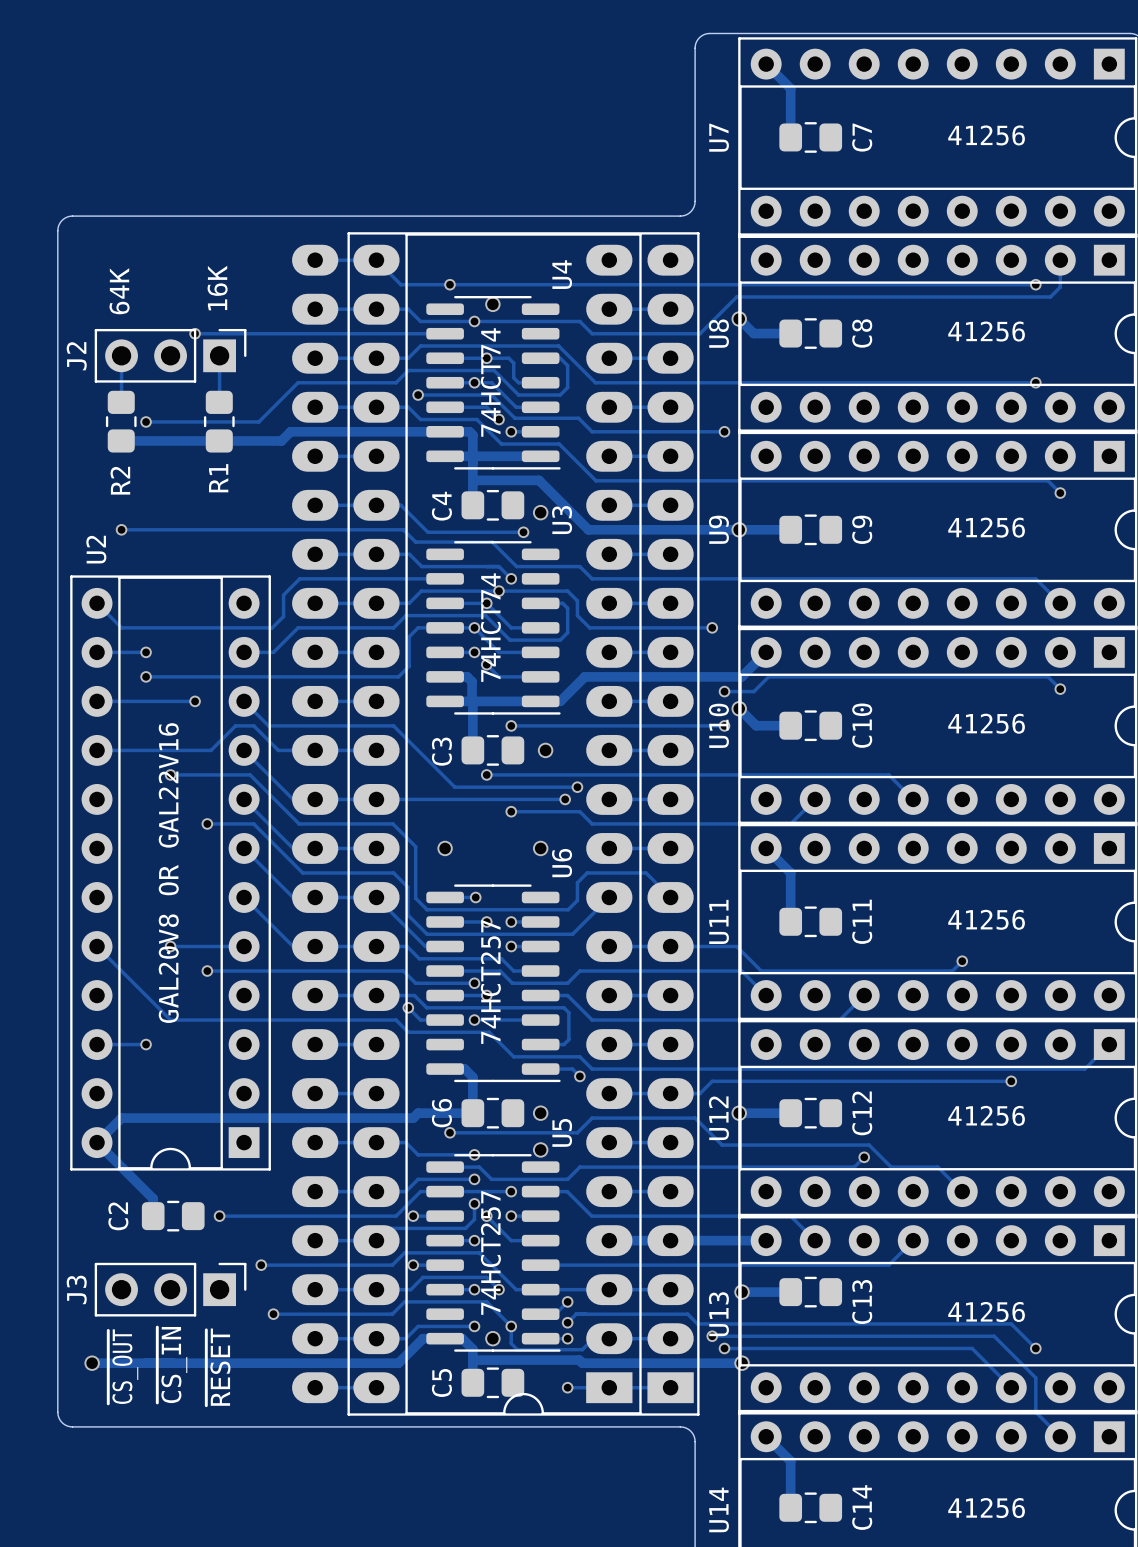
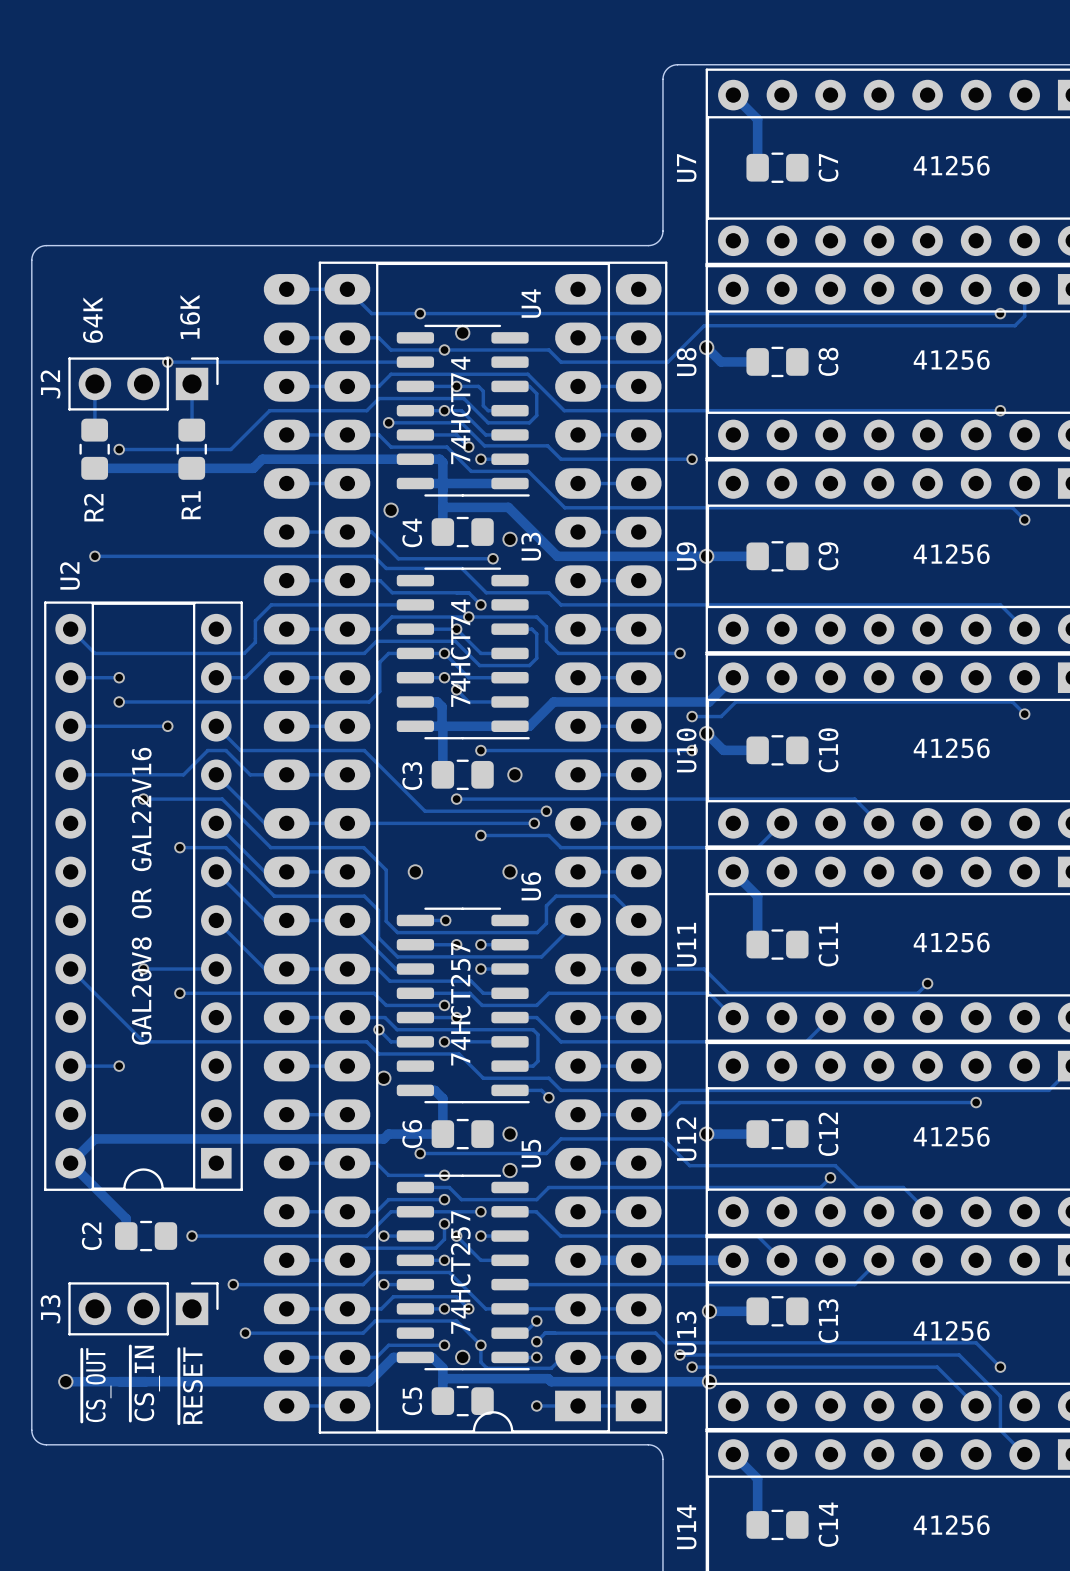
via: none -> (391, 510)
via: none -> (383, 1078)

